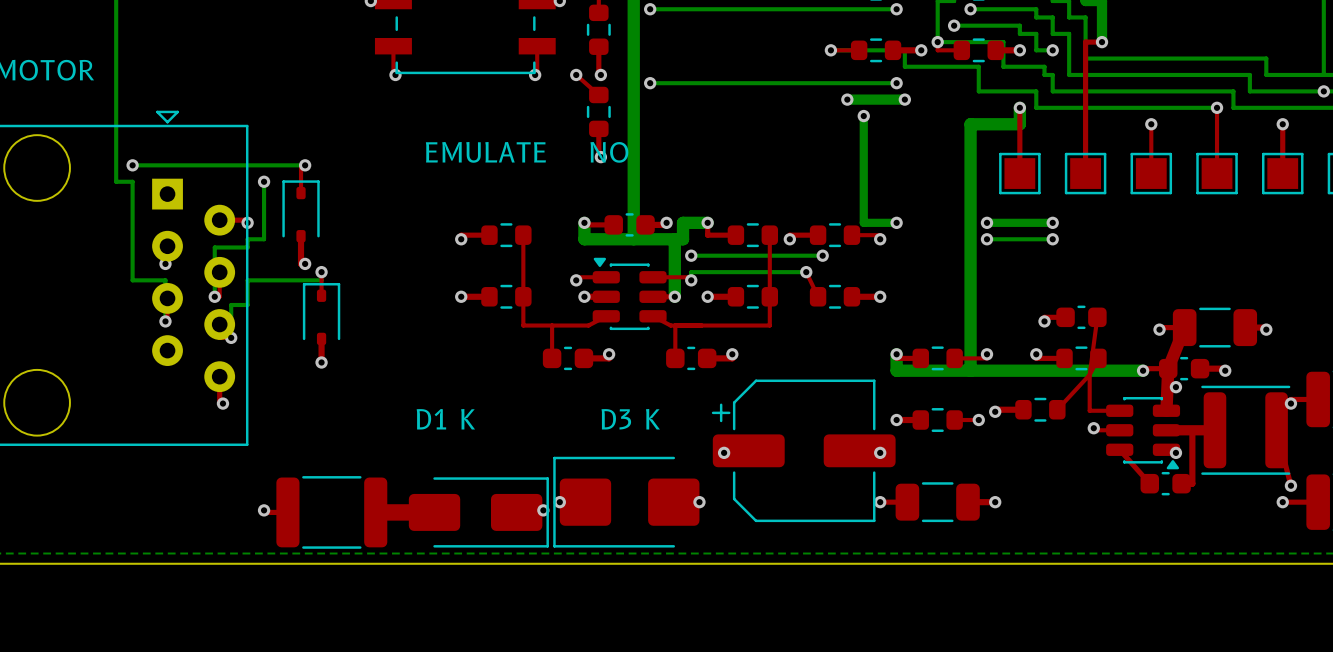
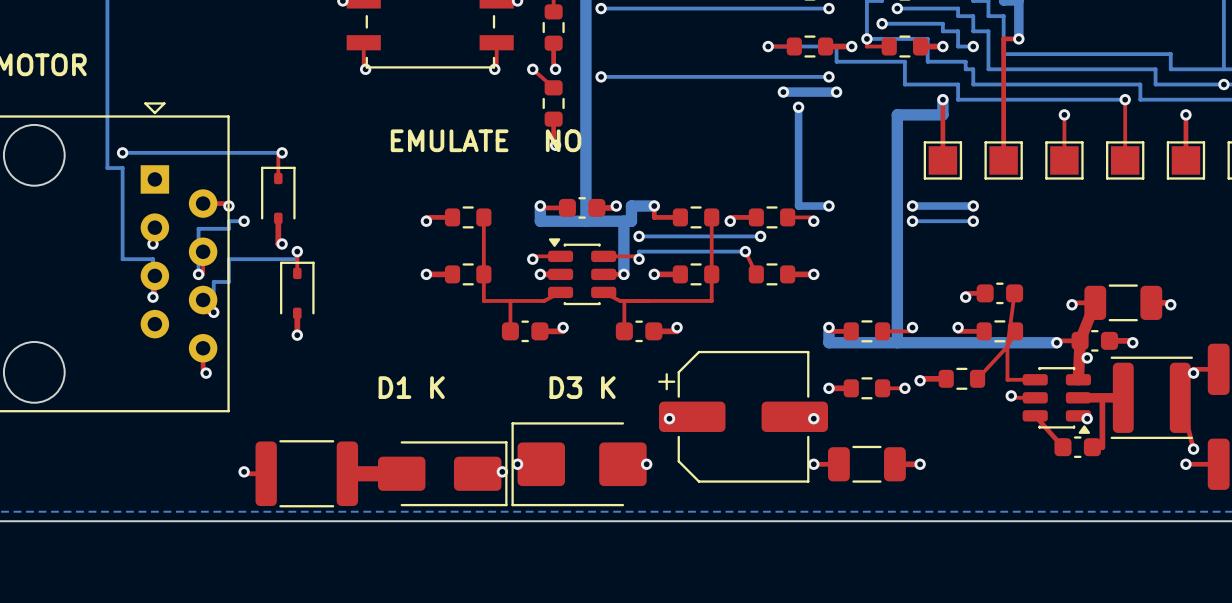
bottom track: (264, 181) (264, 239) -> none
via position: (264, 181) -> (244, 221)

